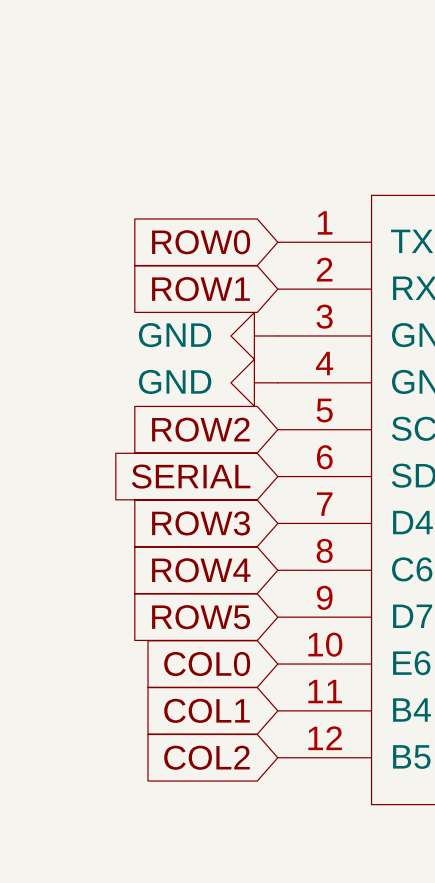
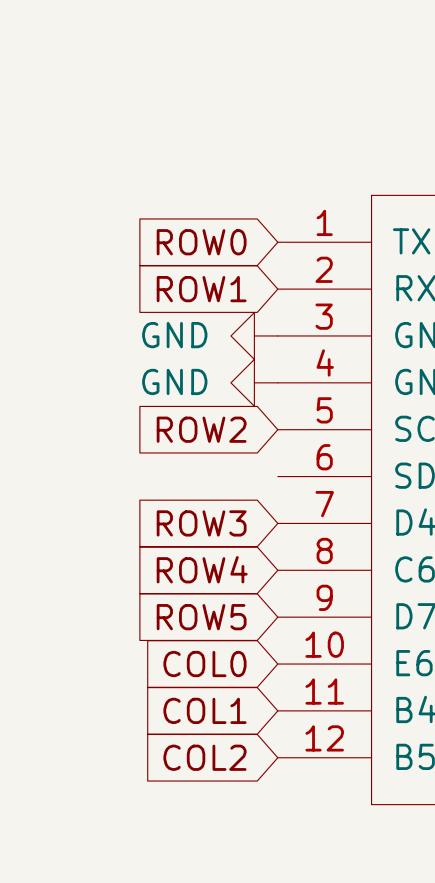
global label: SERIAL (191, 476) -> none

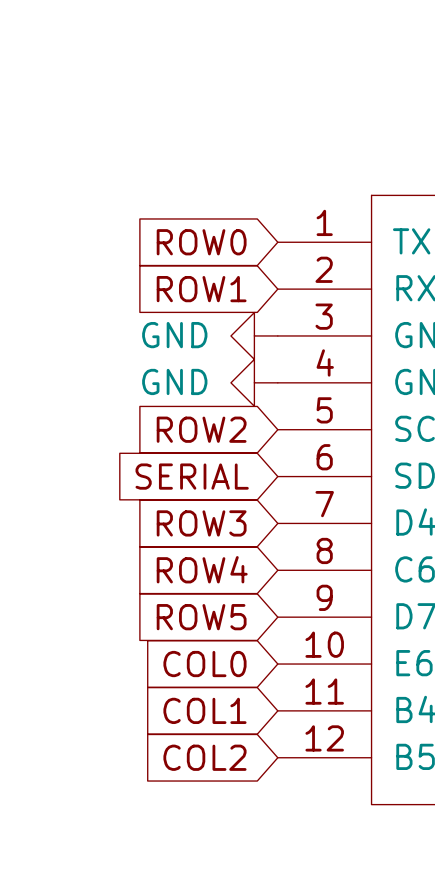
global label: none -> SERIAL (192, 476)

